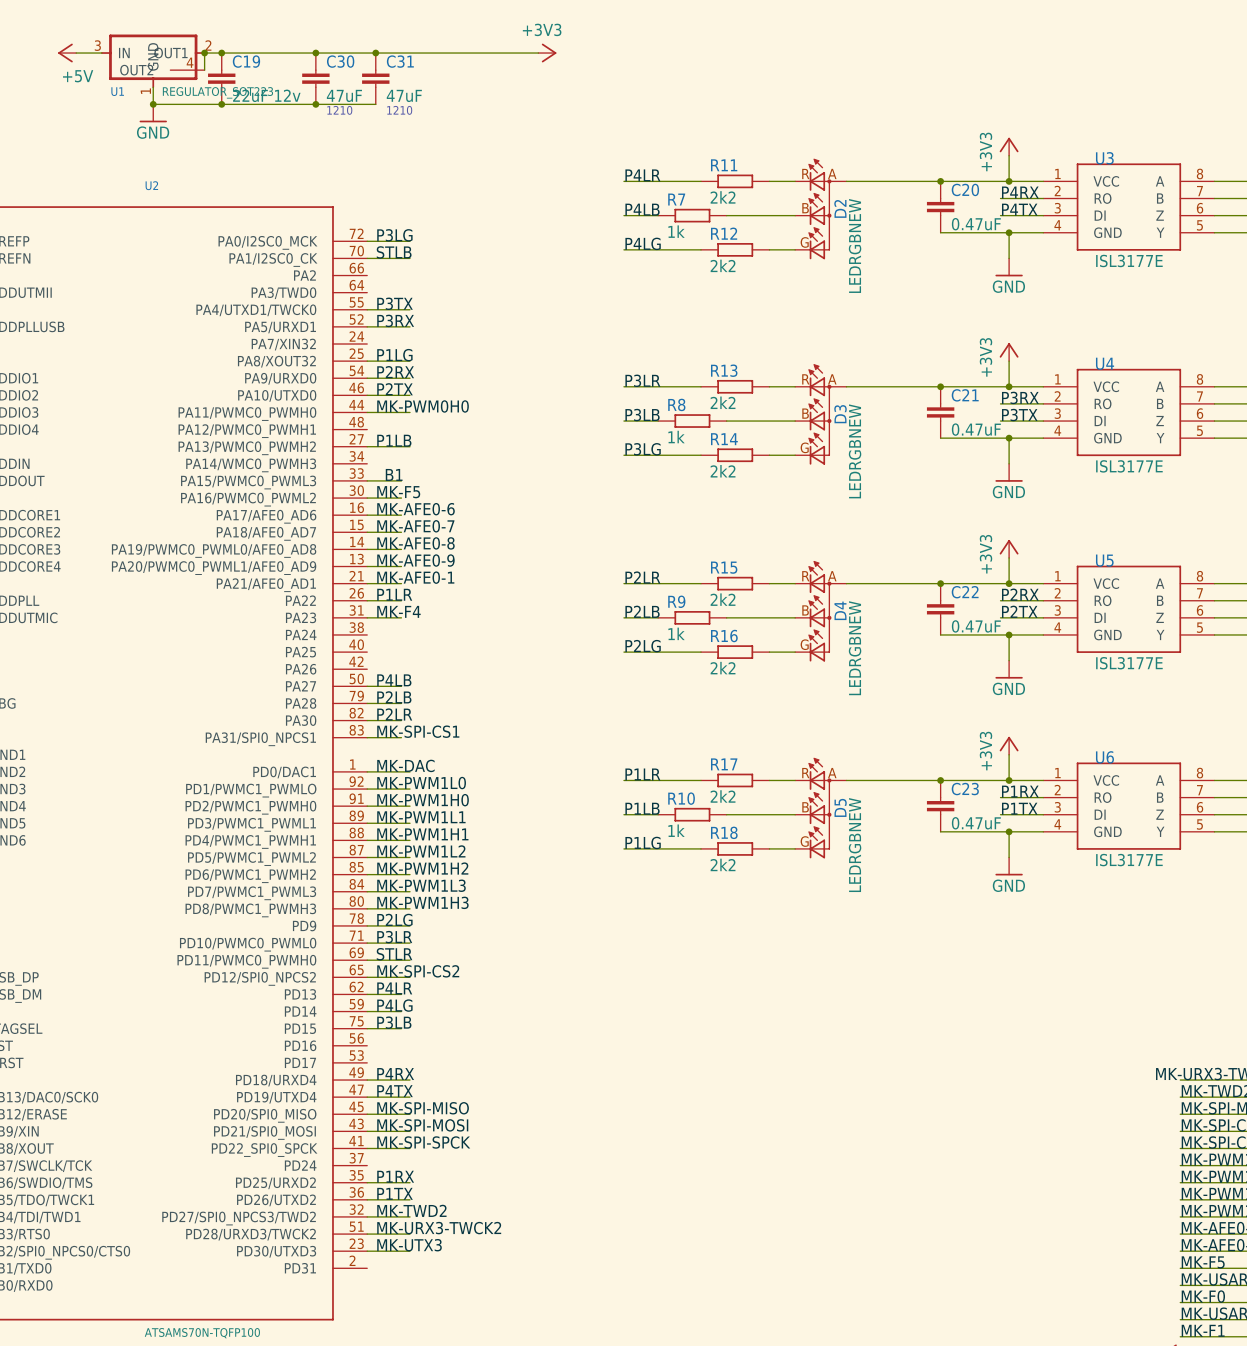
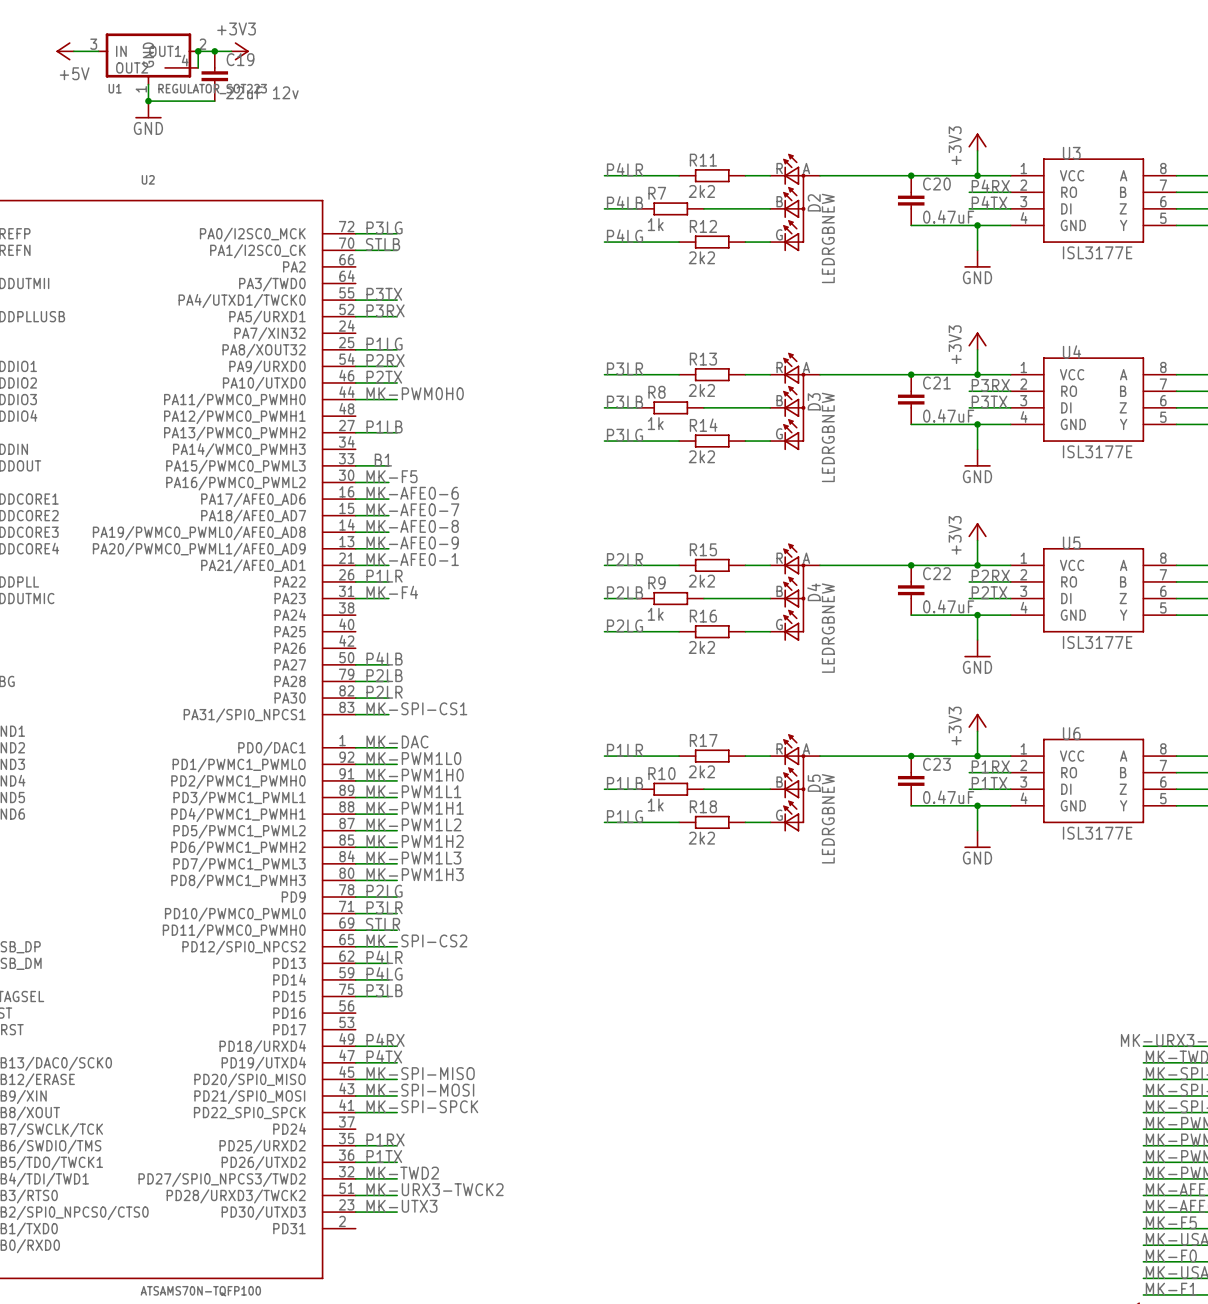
wire: (238, 53) (538, 53) -> none
power symbol: none -> +3V3 (240, 51)
junction: (315, 53) -> none
junction: (375, 53) -> none
power symbol: +3V3 (547, 53) -> none
C30: 47uF (315, 78) -> none
C31: 47uF (375, 78) -> none
wire: (221, 104) (375, 104) -> none
junction: (221, 104) -> none
junction: (315, 104) -> none

